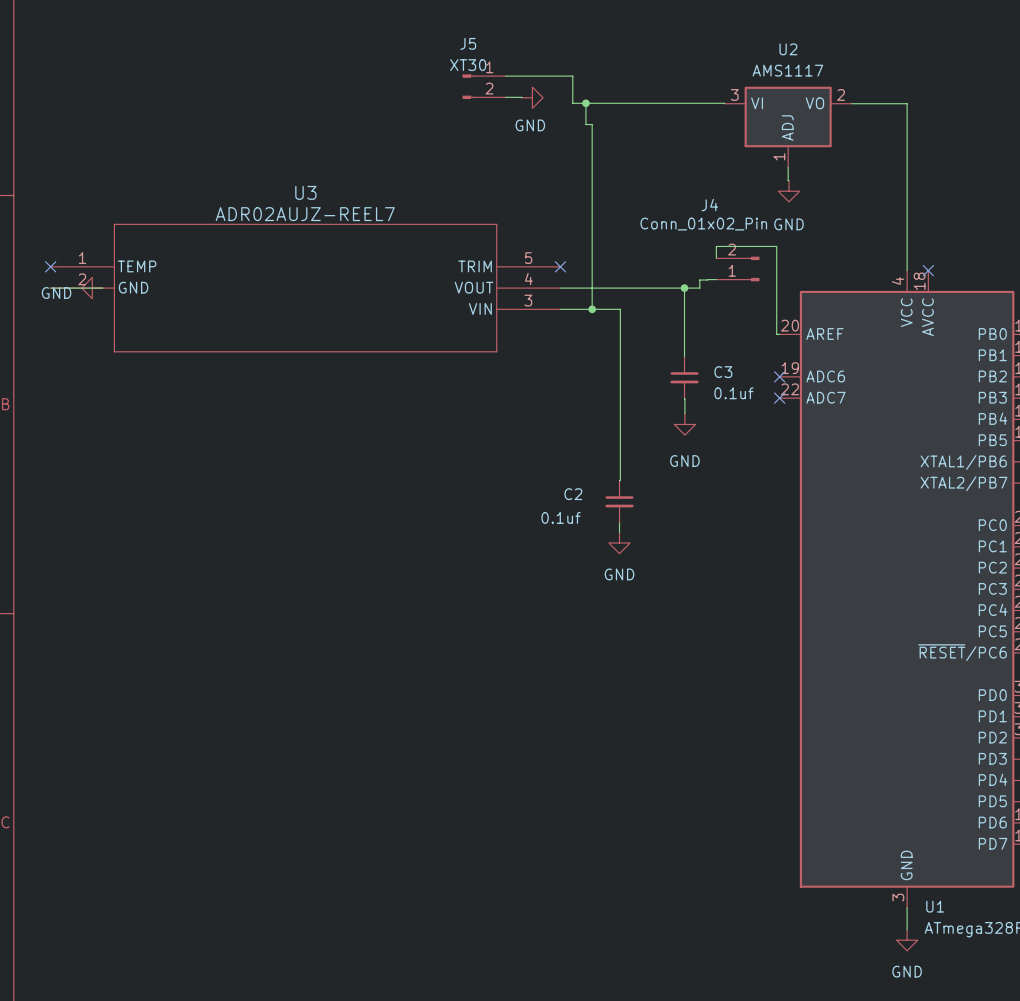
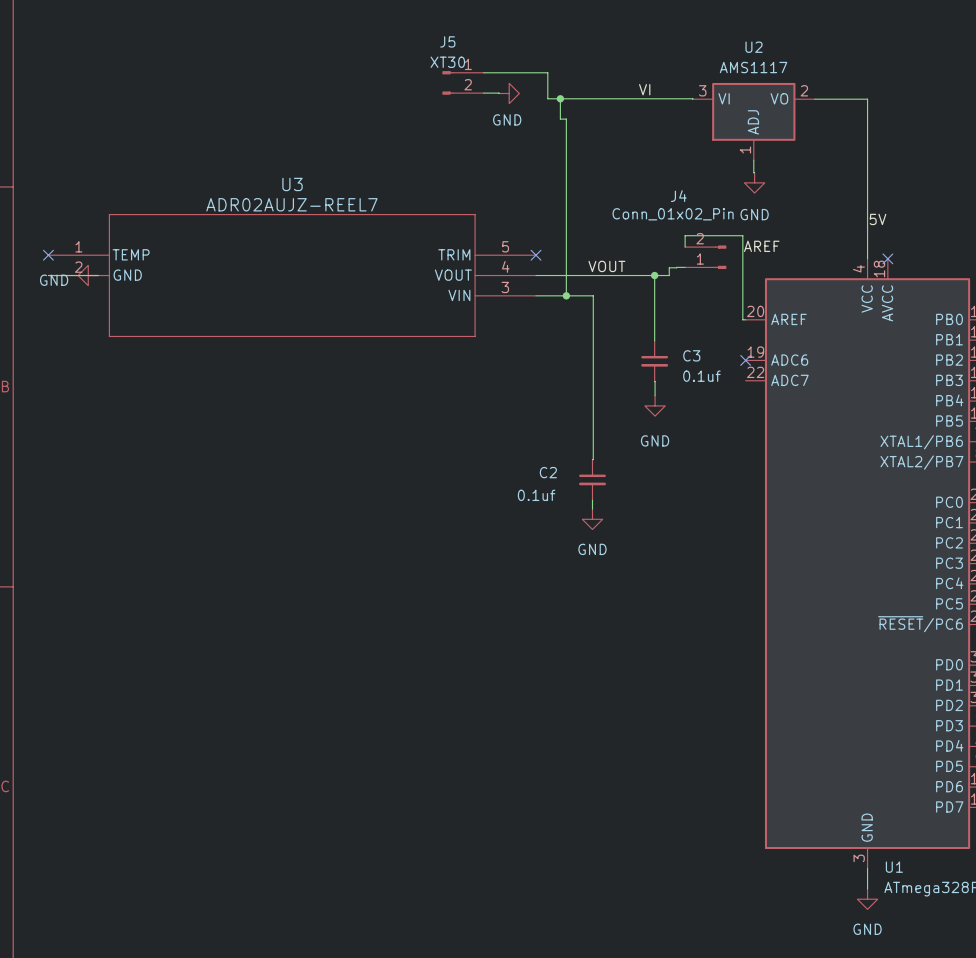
label: none -> VI (644, 89)
label: none -> 5V (878, 219)
label: none -> AREF (761, 246)
label: none -> VOUT (606, 266)
no-connect mark: (779, 398) -> none

